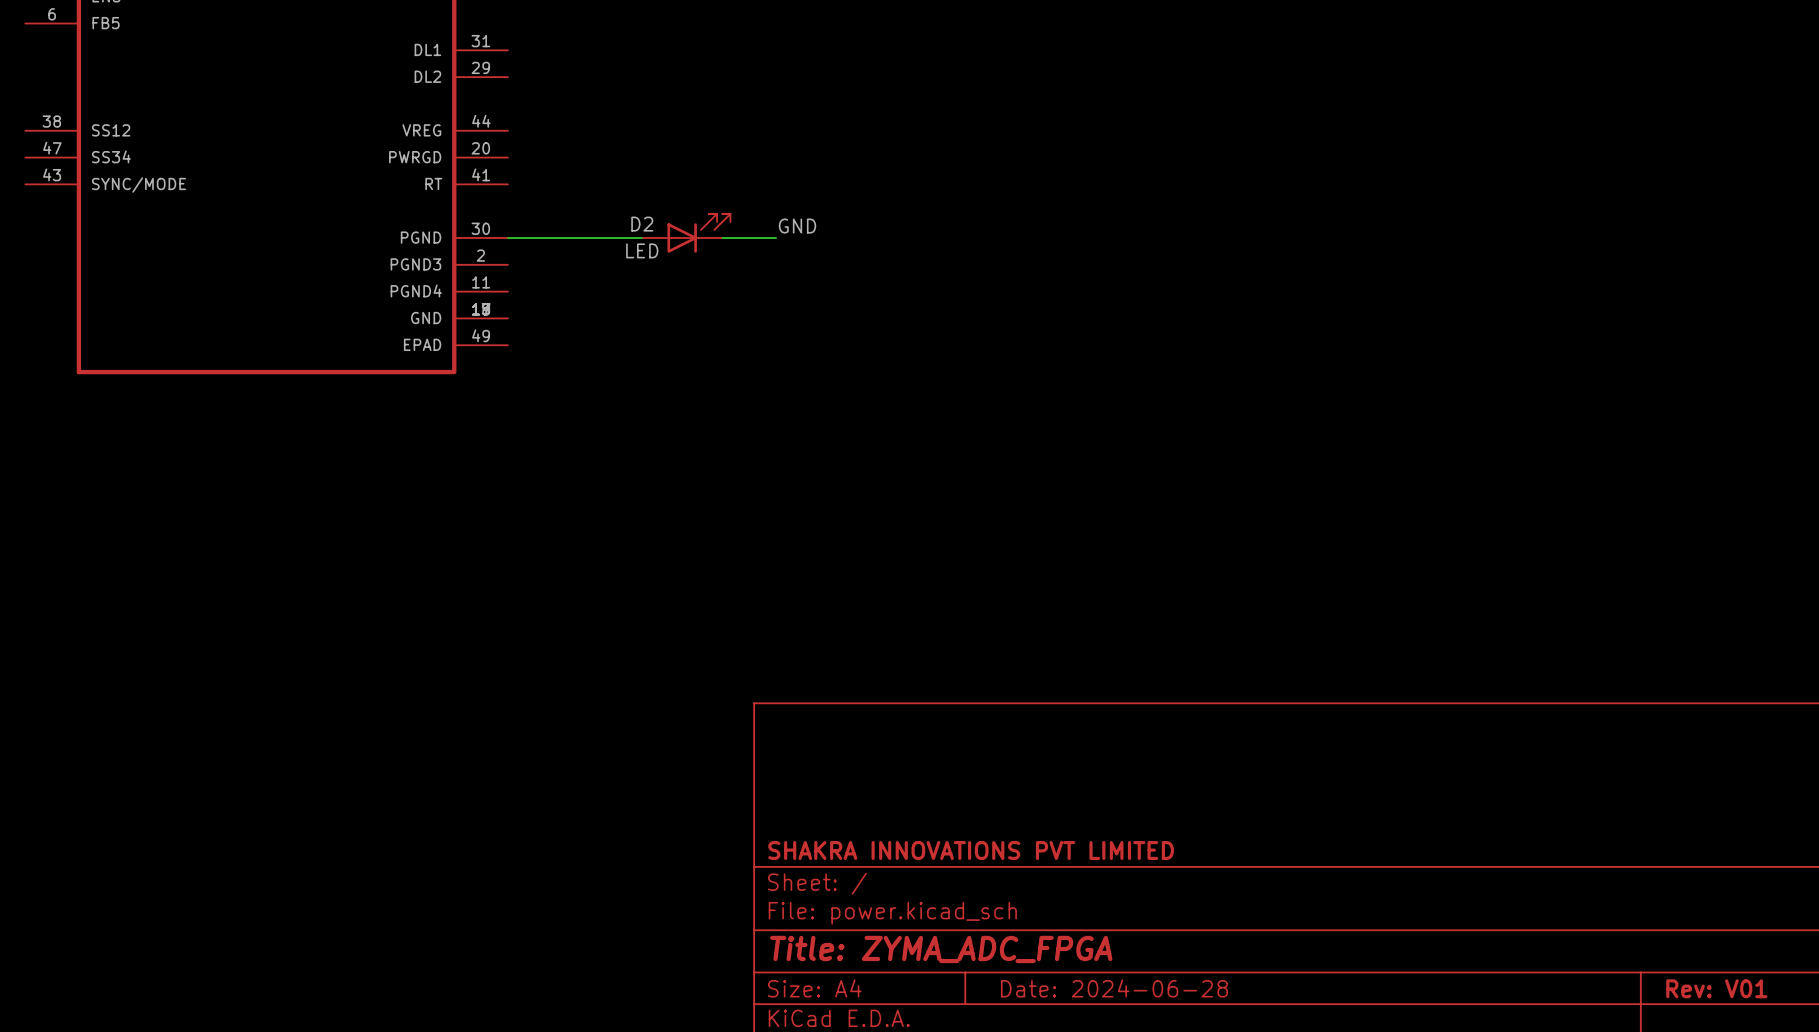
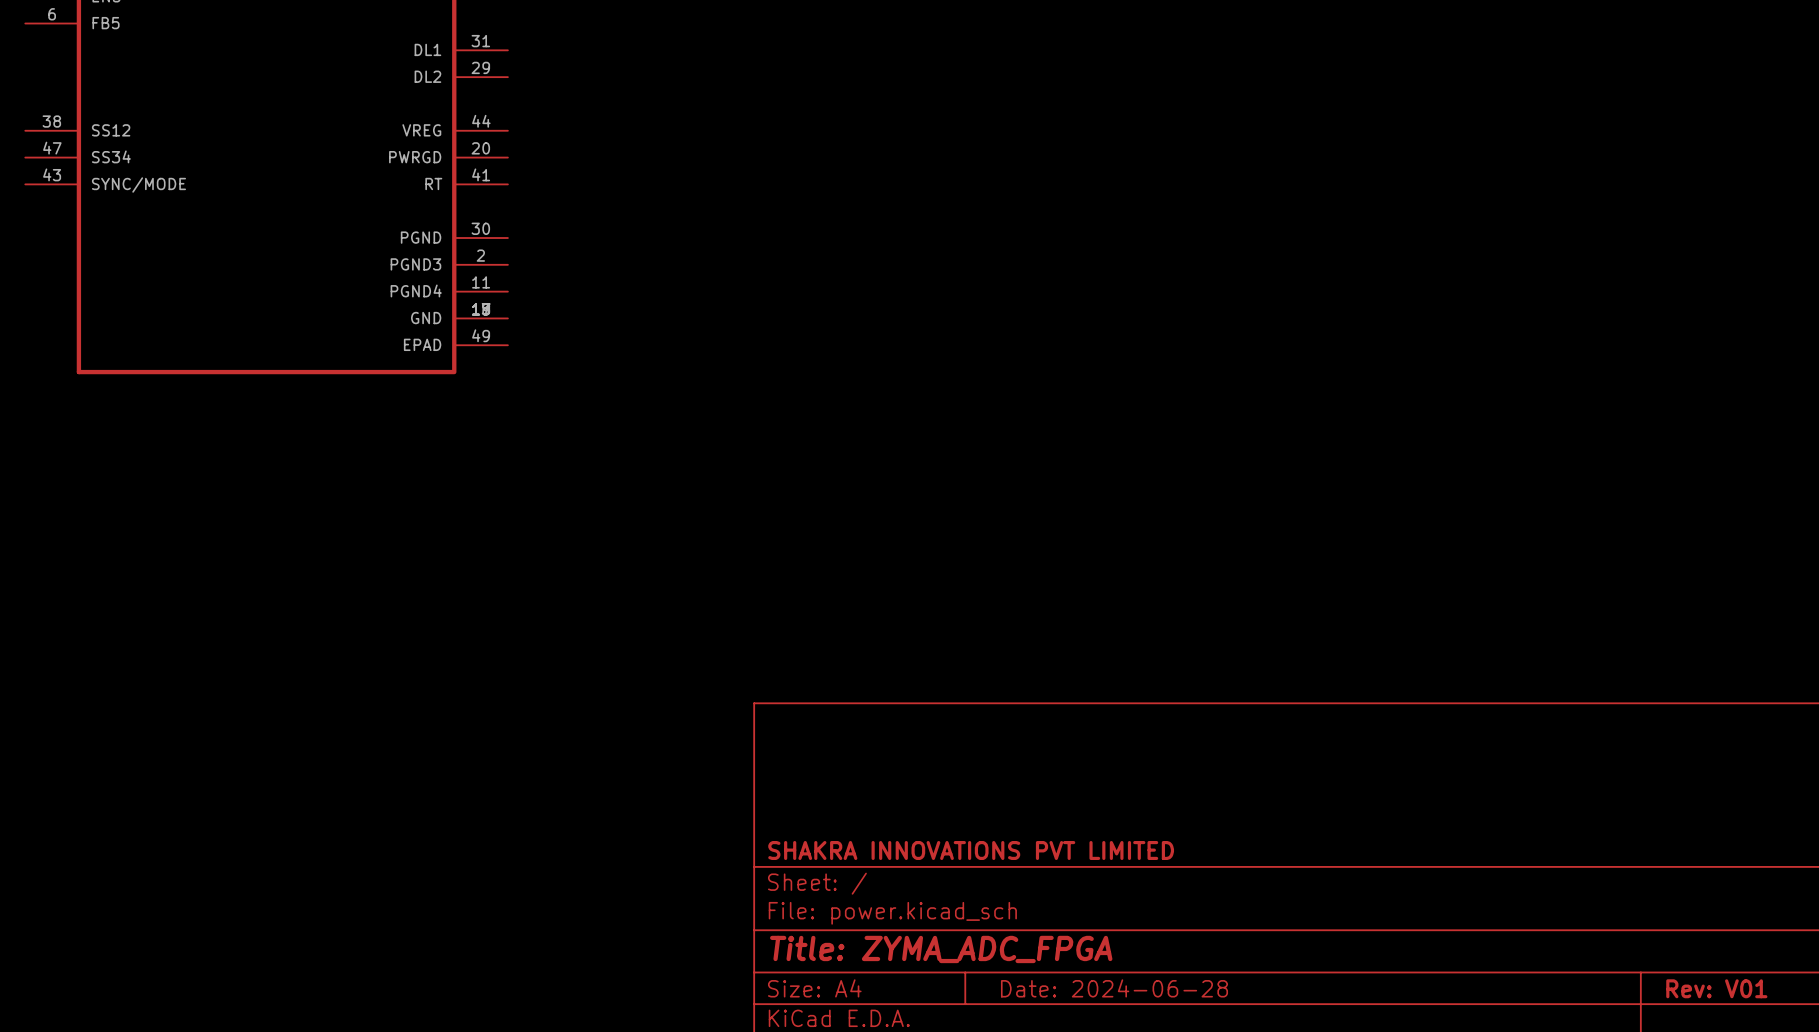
label: GND (797, 226) -> none
D2: LED (686, 233) -> none
wire: (507, 238) (641, 238) -> none
wire: (722, 238) (776, 238) -> none

